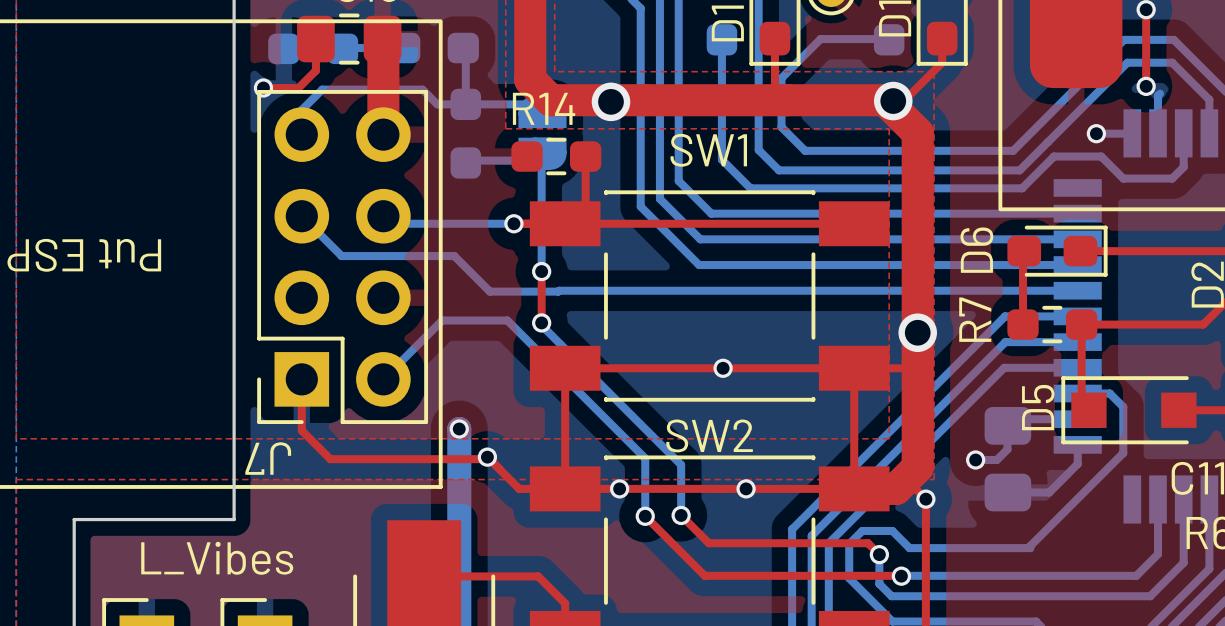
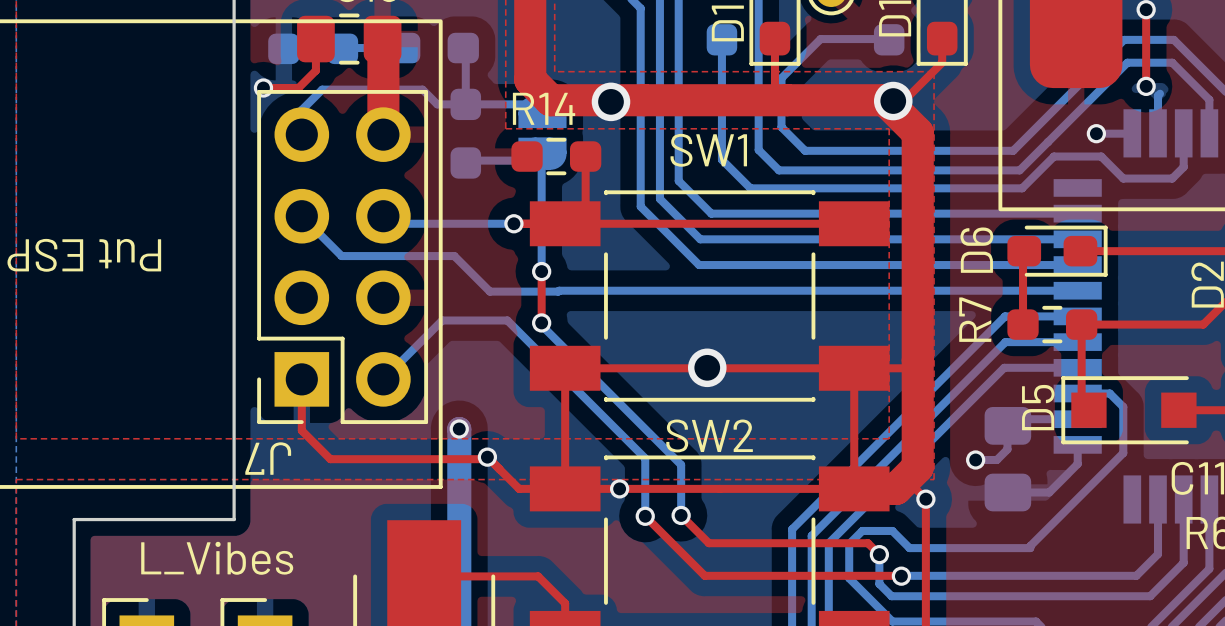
via: (917, 332) -> none
via size: [713, 358, 733, 378] -> [687, 348, 727, 388]
via: (746, 488) -> none

